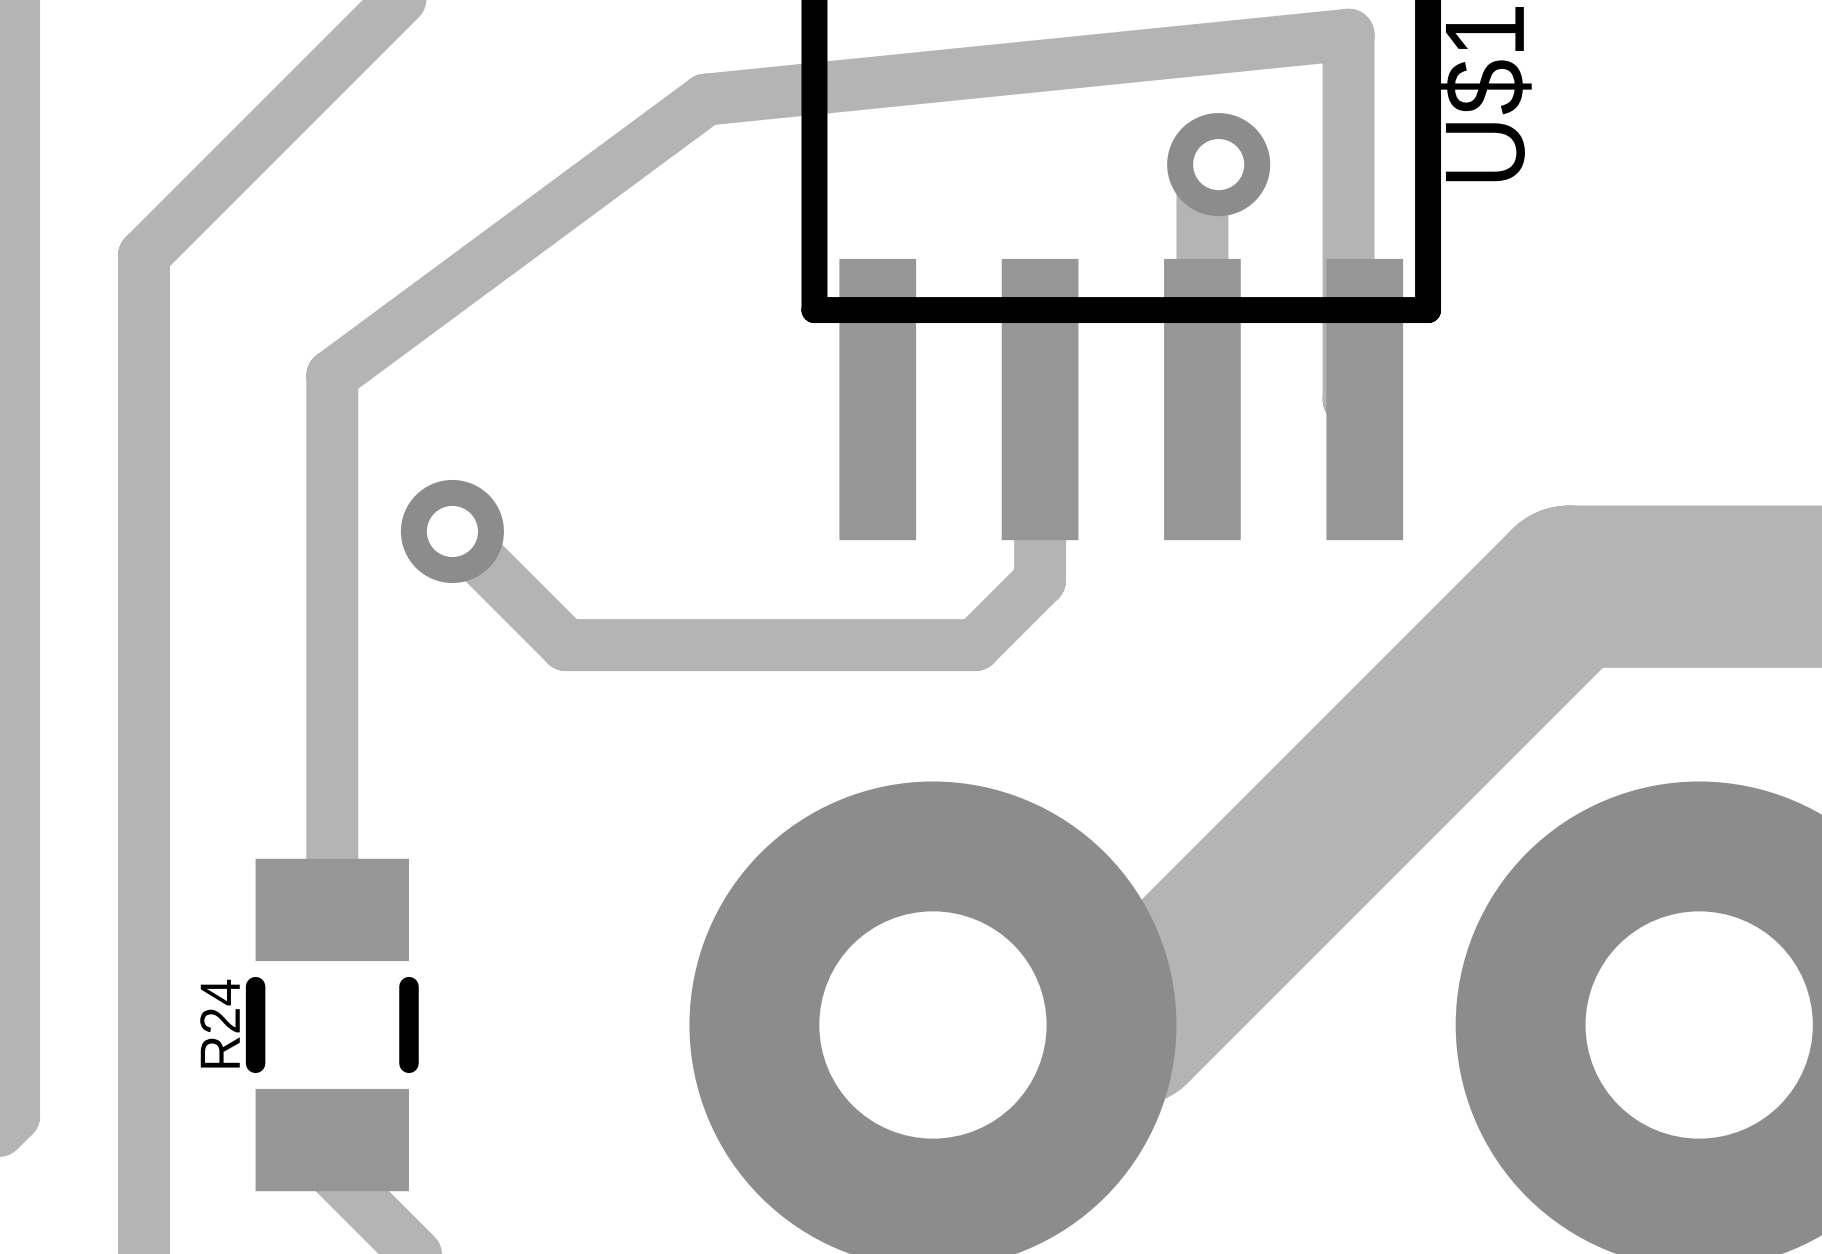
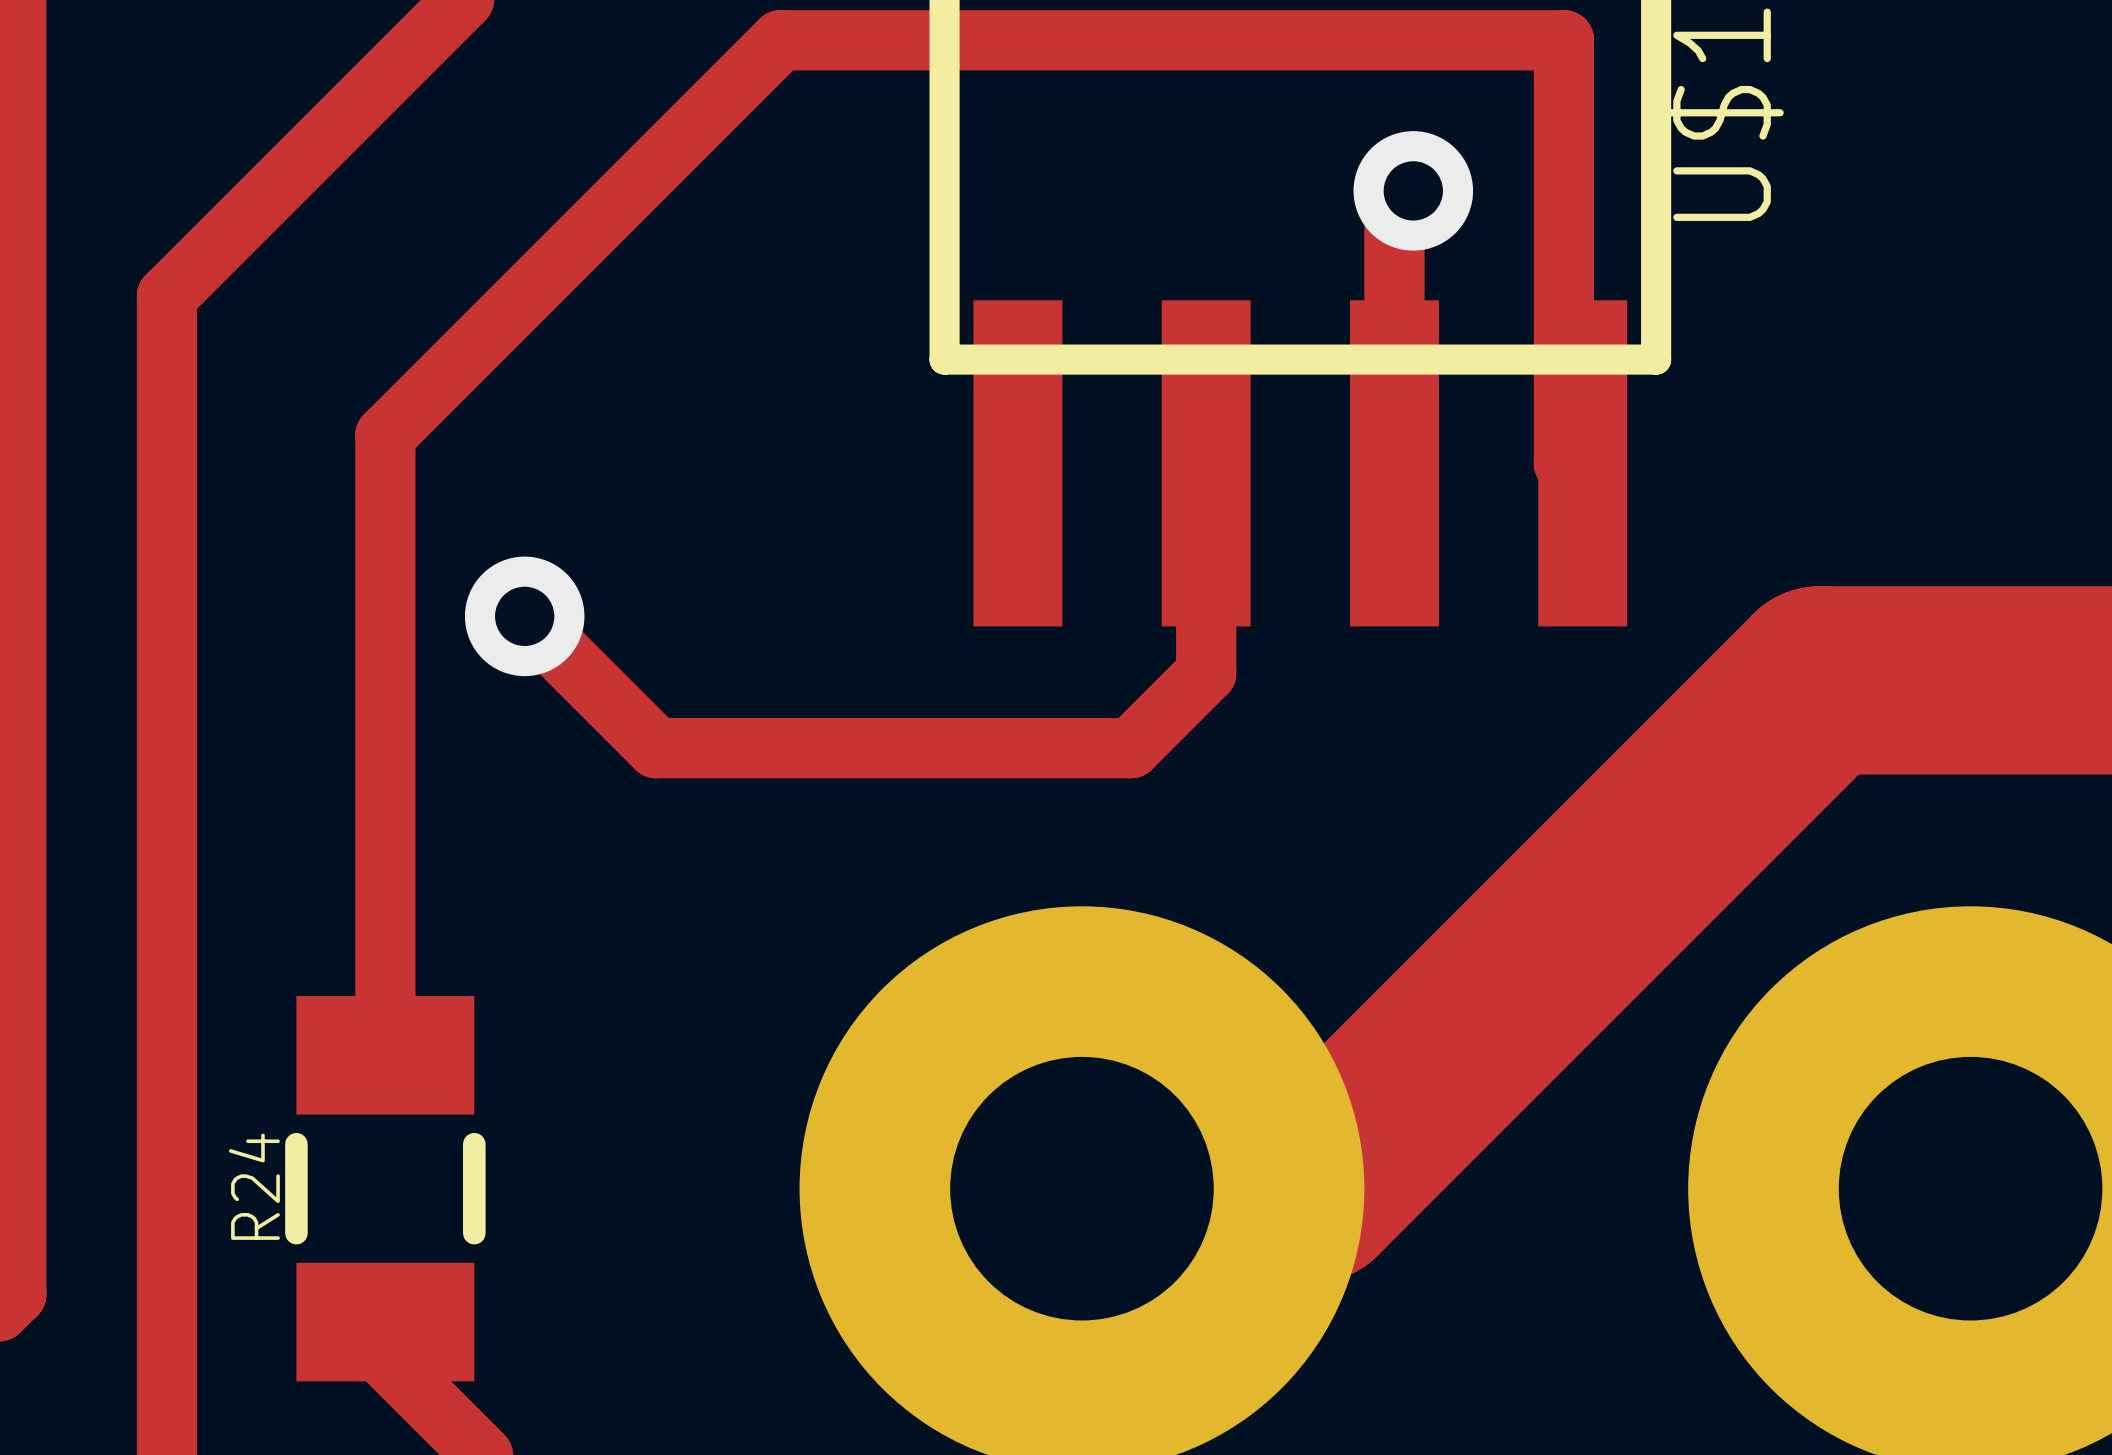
track: (1348, 34) (705, 99) (332, 375) -> (1563, 40) (780, 40) (385, 435)

